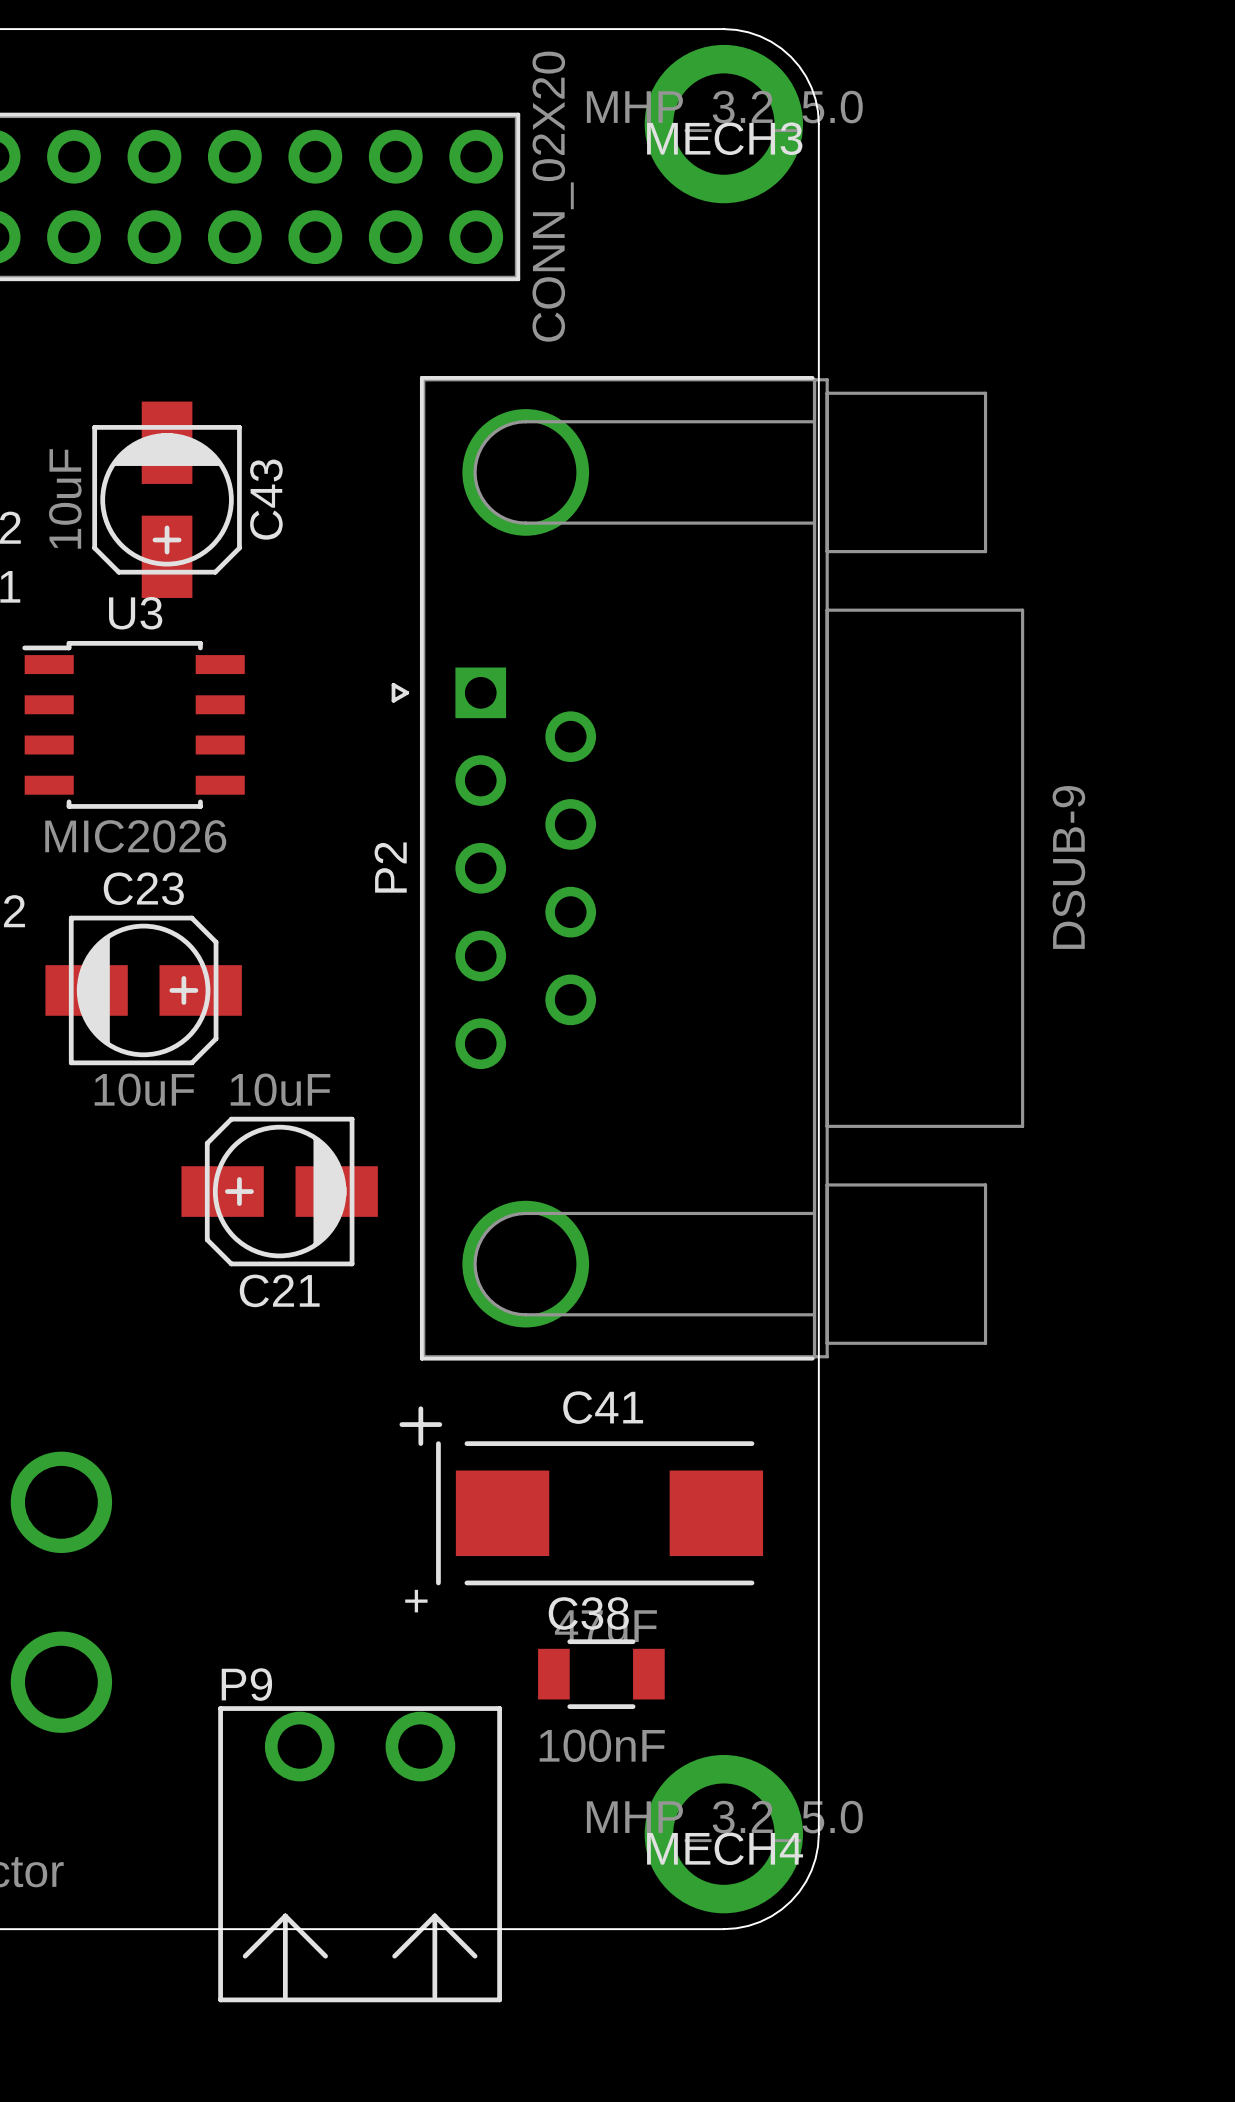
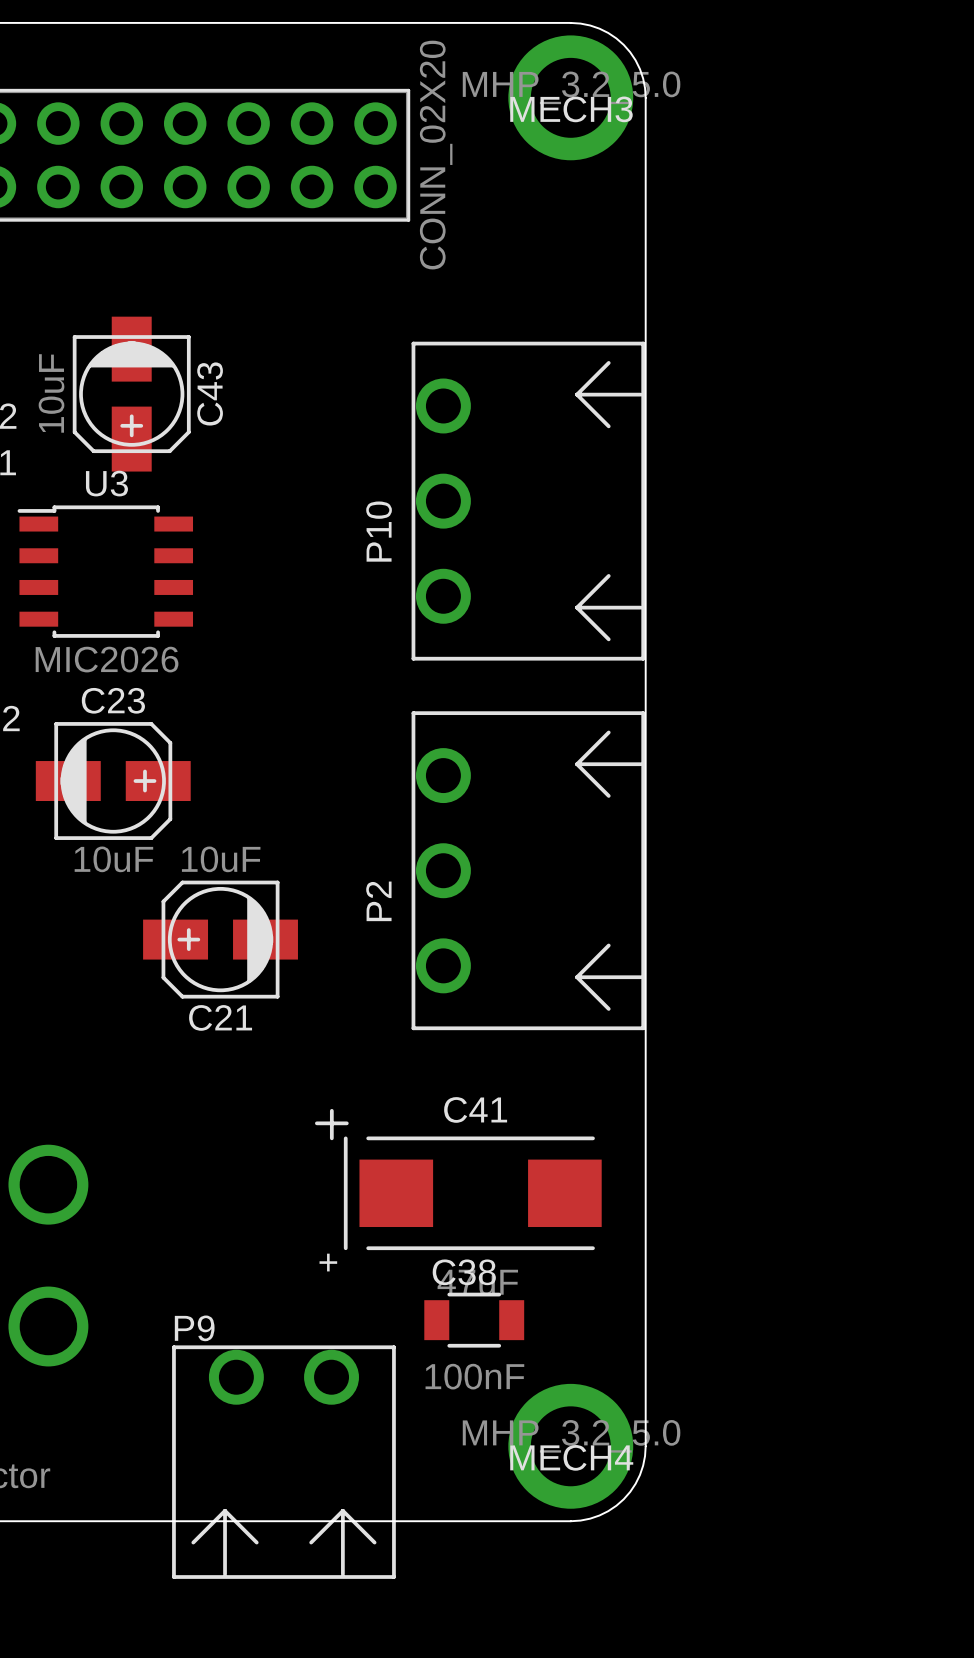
P2 footprint: [391, 376, 1025, 1361] -> [411, 711, 646, 1031]
P10: none -> (528, 501)
P2 name position: P2 (390, 867) -> P2 (378, 901)
P2 value: DSUB-9 (1068, 867) -> none

